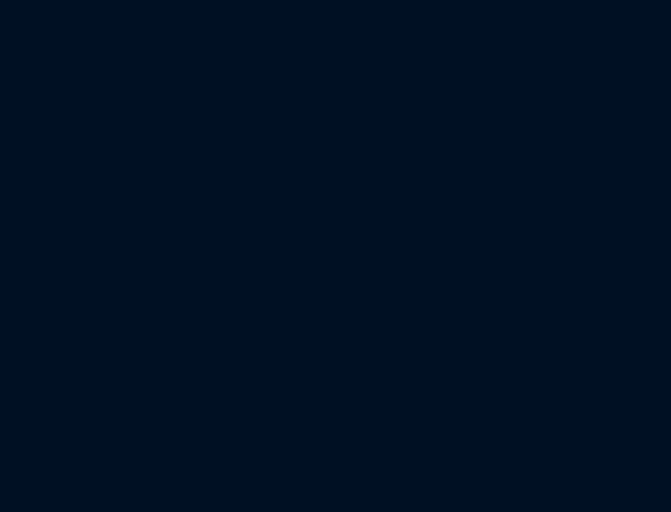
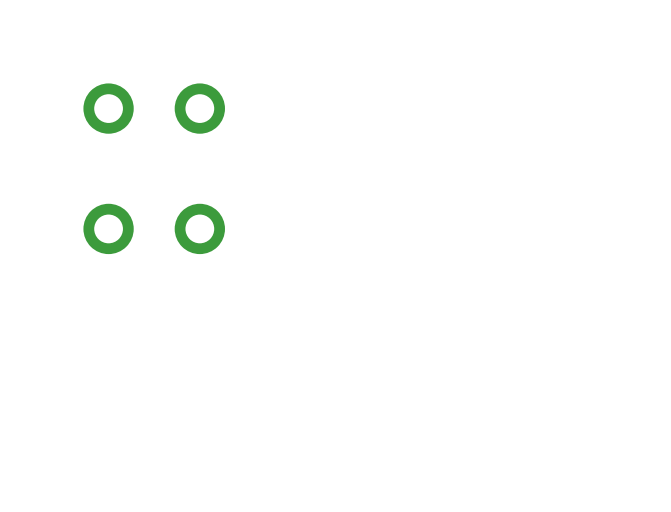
part: none -> (154, 108)
part: none -> (154, 228)

